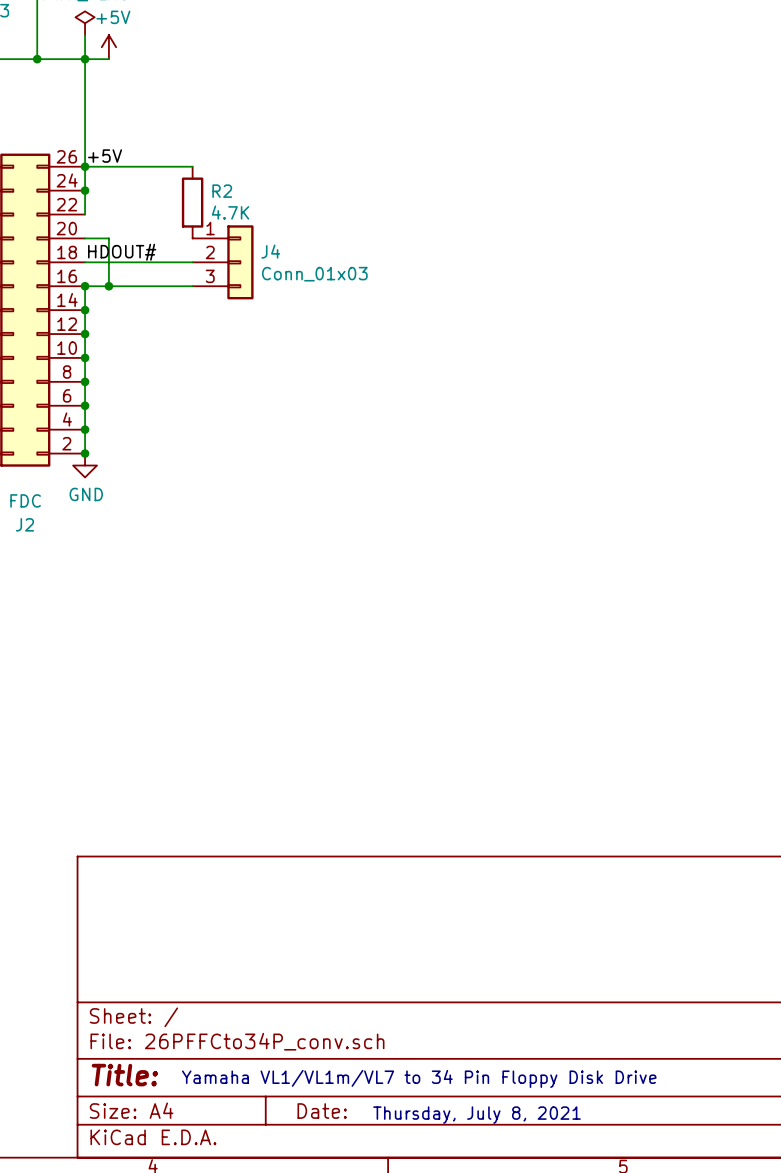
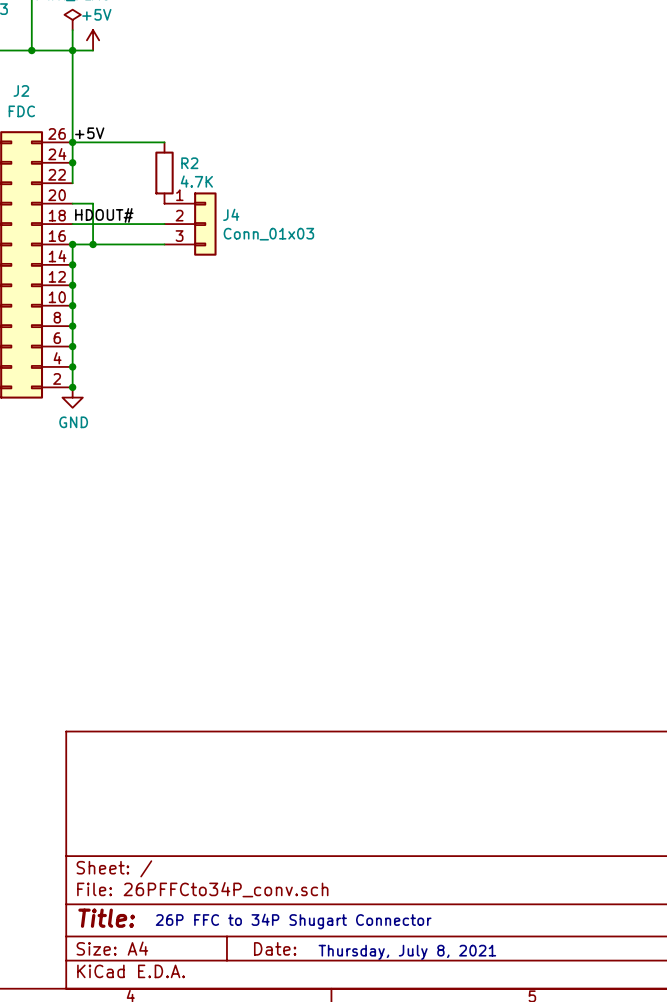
J2 value position: FDC (25, 500) -> FDC (21, 111)
J2 name position: J2 (25, 524) -> J2 (21, 90)
text: Yamaha VL1/VL1m/VL7 to 34 Pin Floppy Disk Drive (419, 1078) -> 26P FFC to 34P Shugart Connector (293, 921)

